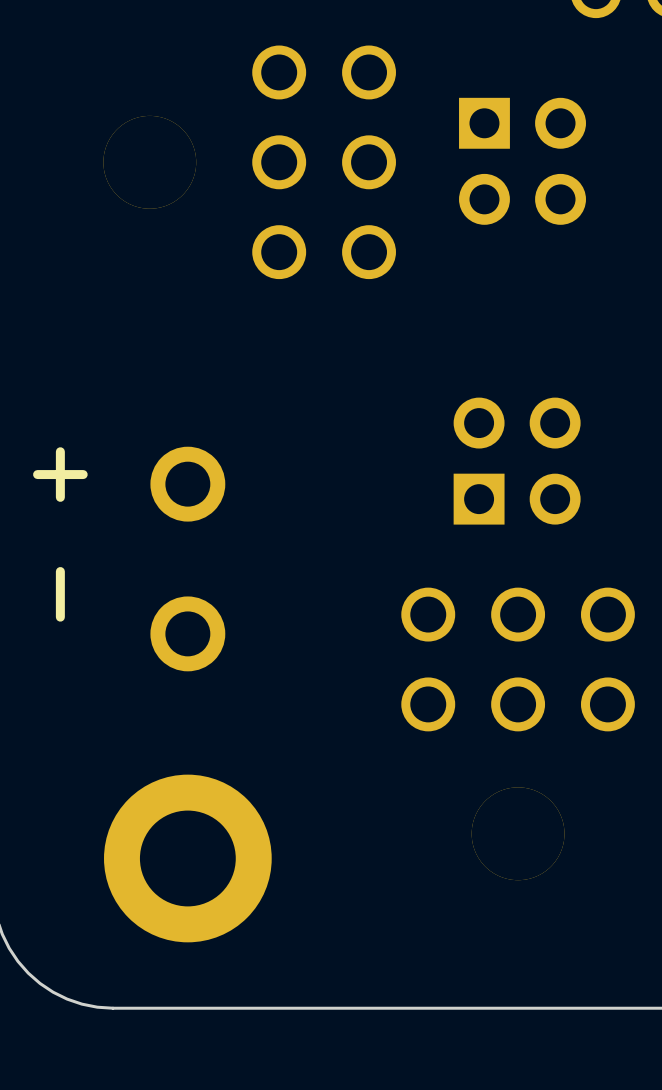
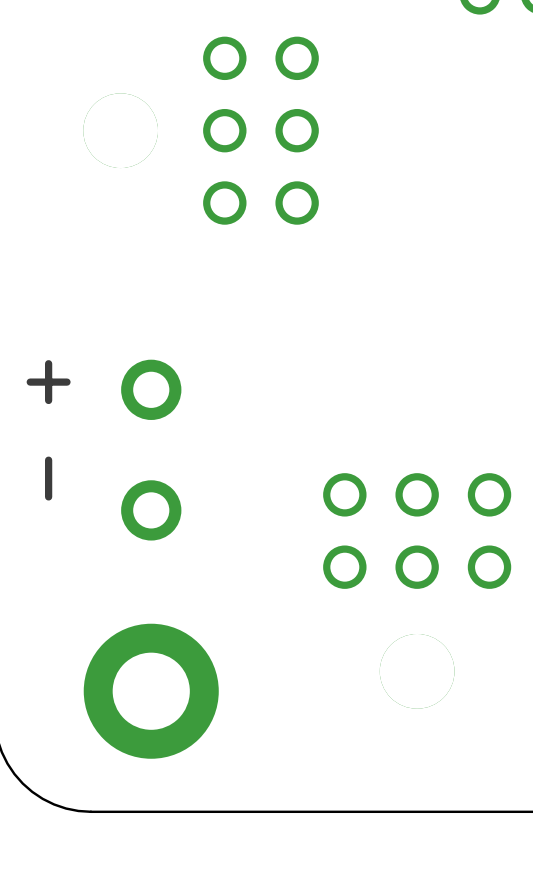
part: (522, 161) -> none
part: (517, 461) -> none

